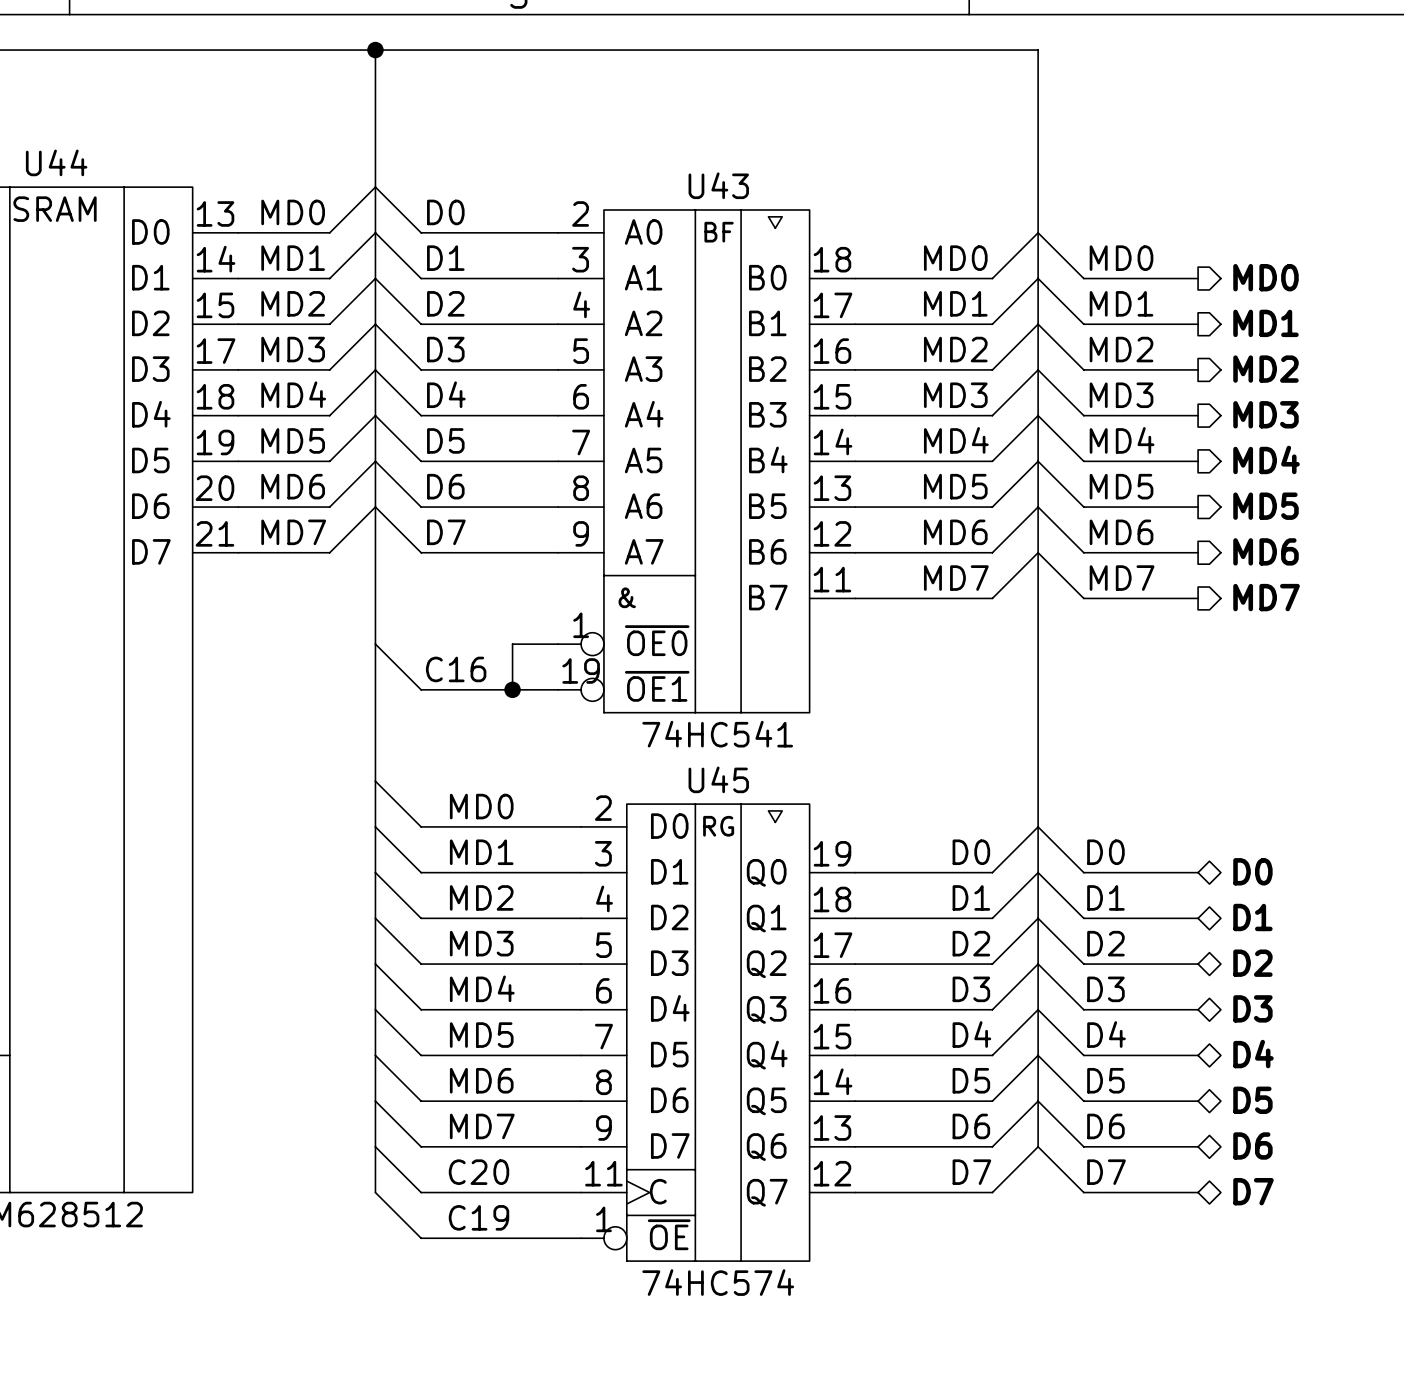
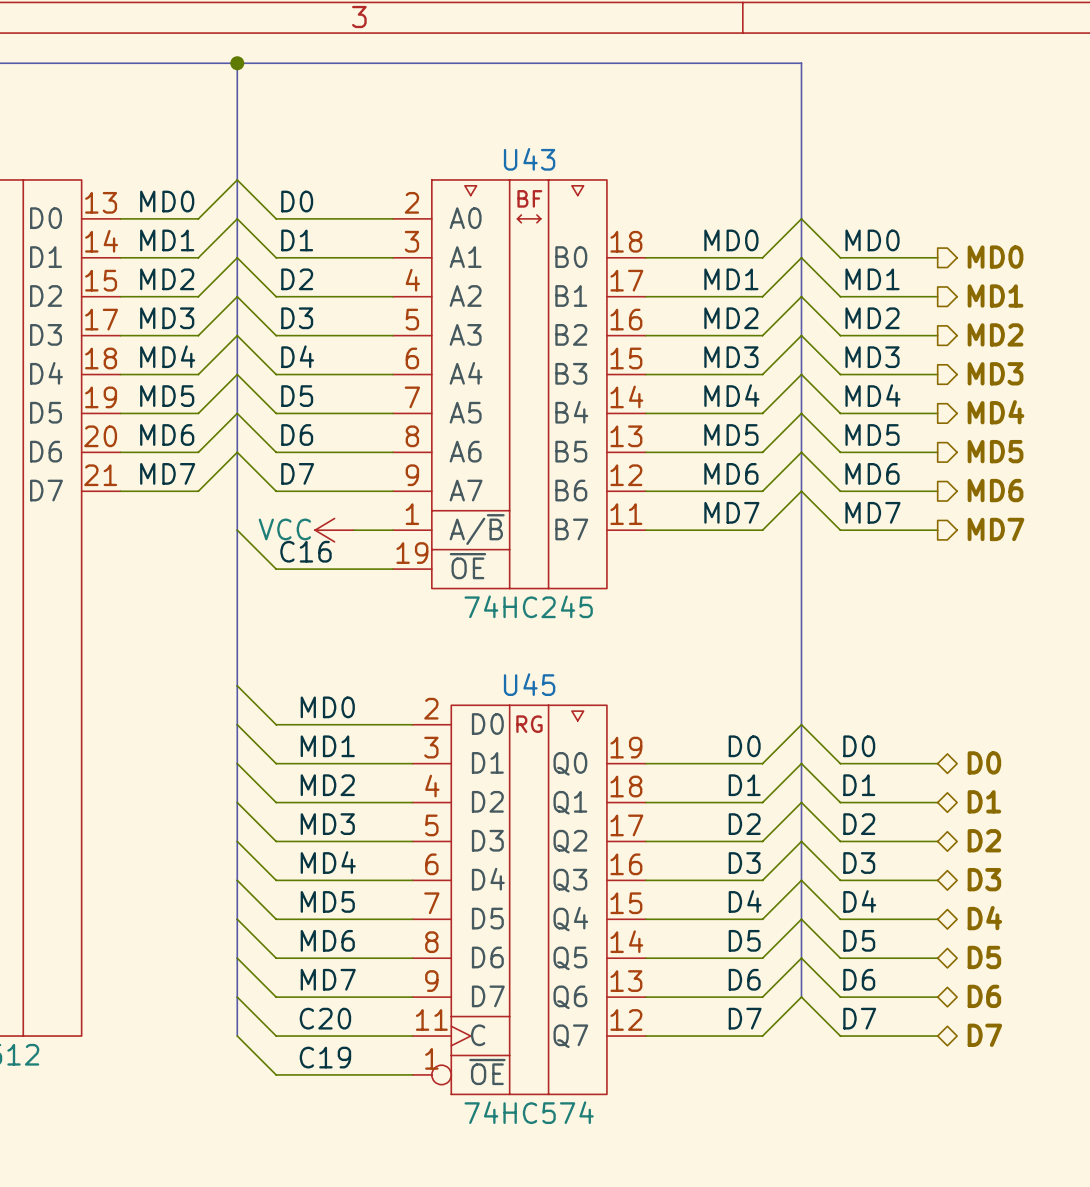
U43 symbol: [558, 209, 856, 713] -> [392, 179, 646, 589]
power symbol: none -> VCC (334, 530)
wire: none -> (354, 530) (392, 530)
wire: (375, 644) (421, 689) (558, 689) -> none
wire: (512, 644) (512, 689) -> (354, 569) (276, 569) (237, 530)
label position: C16 (456, 669) -> C16 (305, 551)
junction: (512, 689) -> none
U43 value: 74HC541 (717, 734) -> 74HC245 (528, 606)

